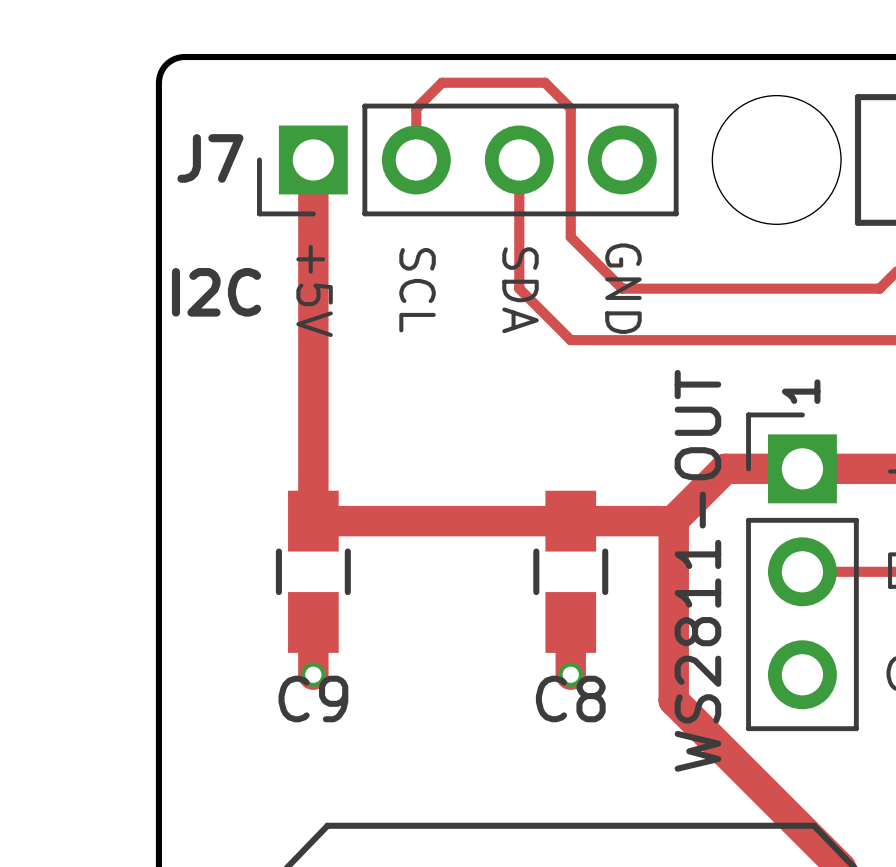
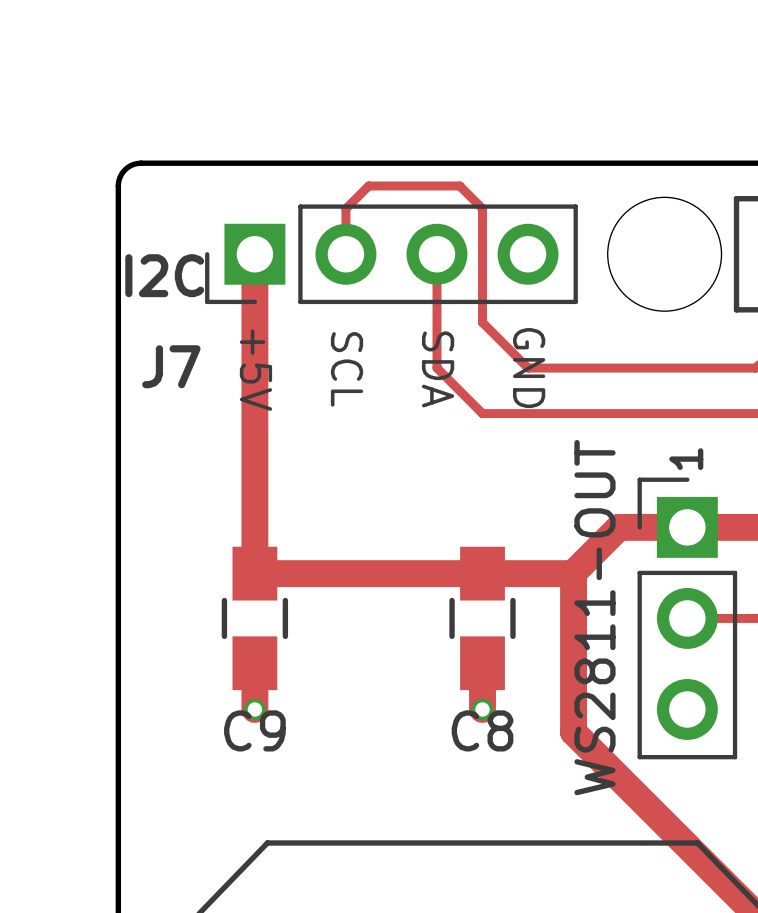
J7 name position: J7 (210, 158) -> J7 (171, 366)
J7 value position: I2C (216, 292) -> I2C (164, 275)

